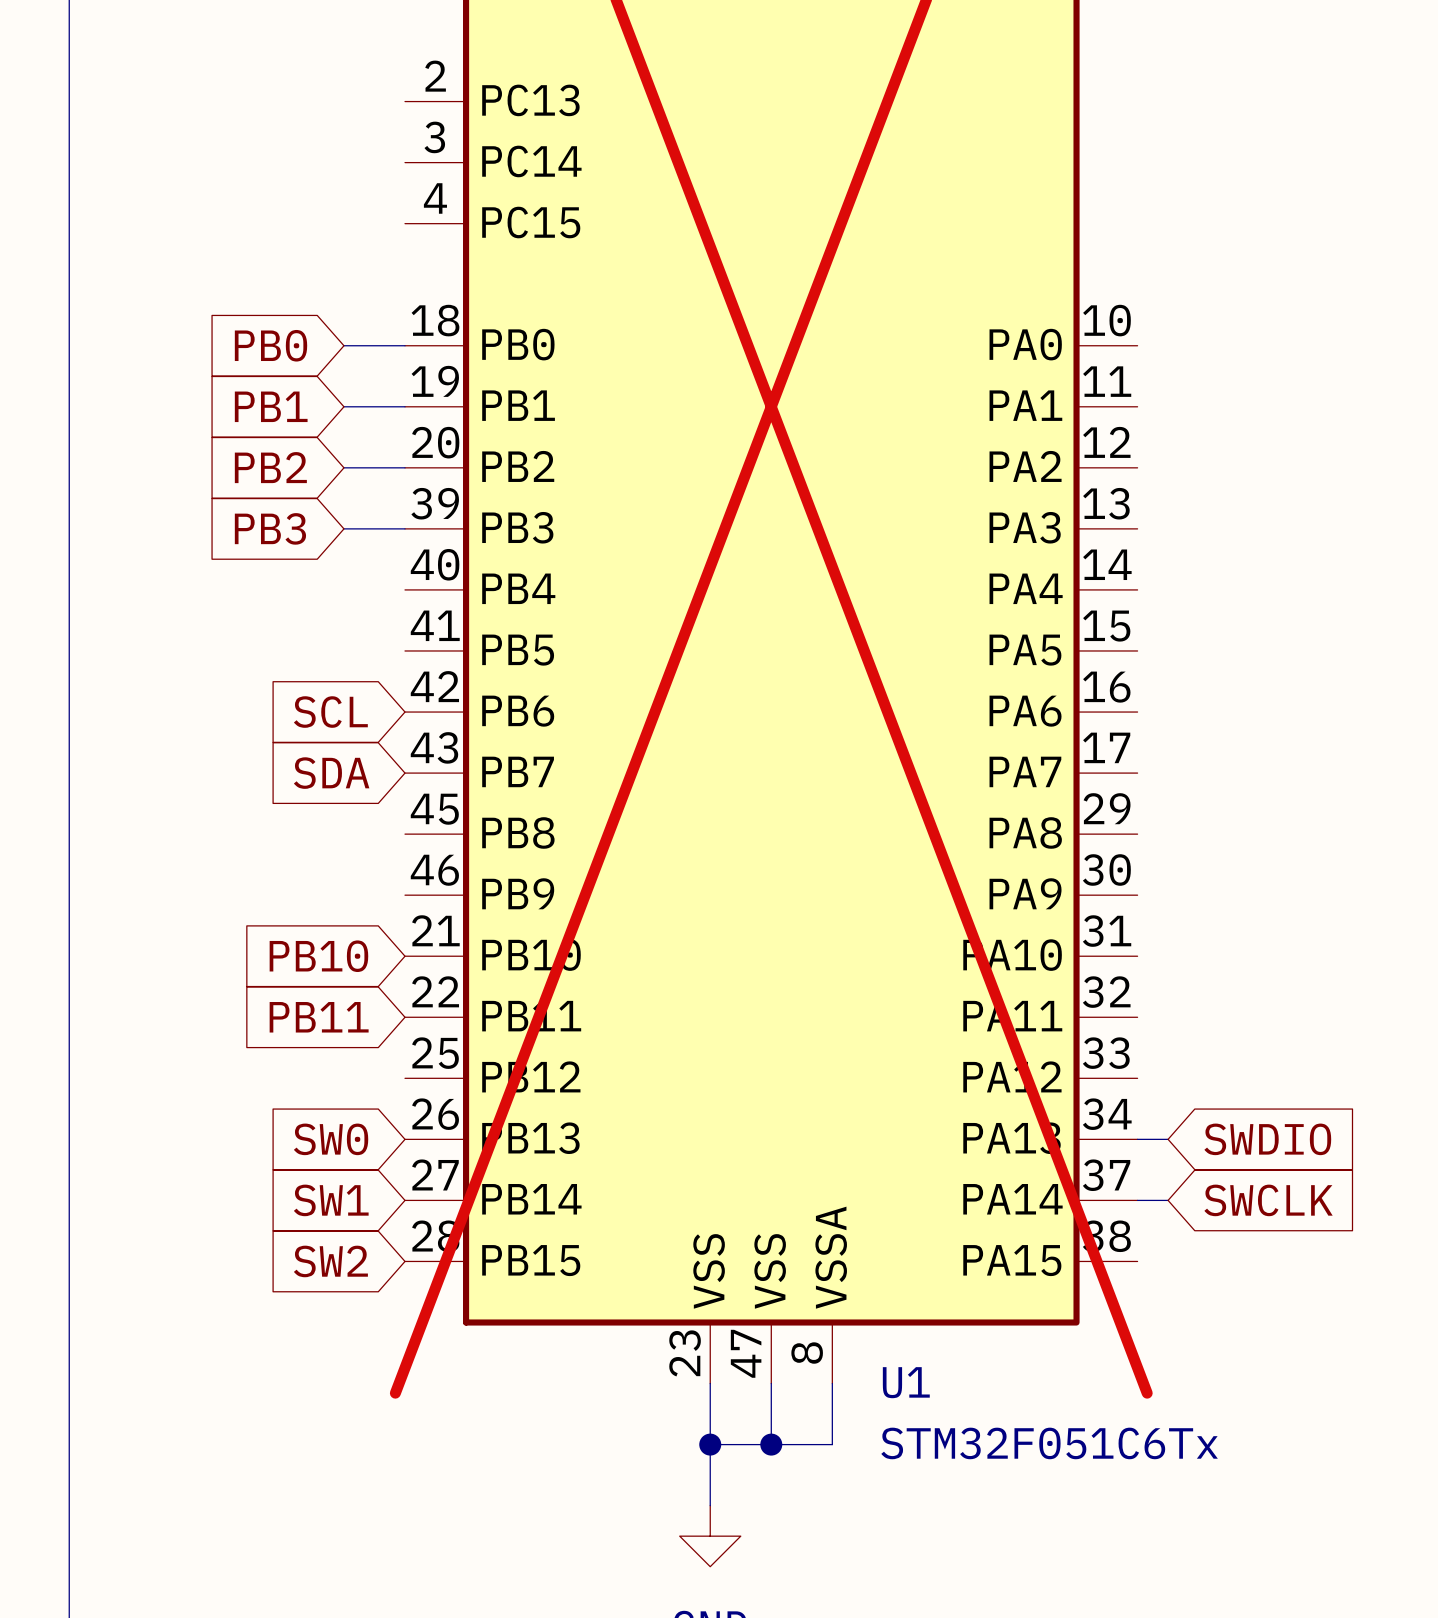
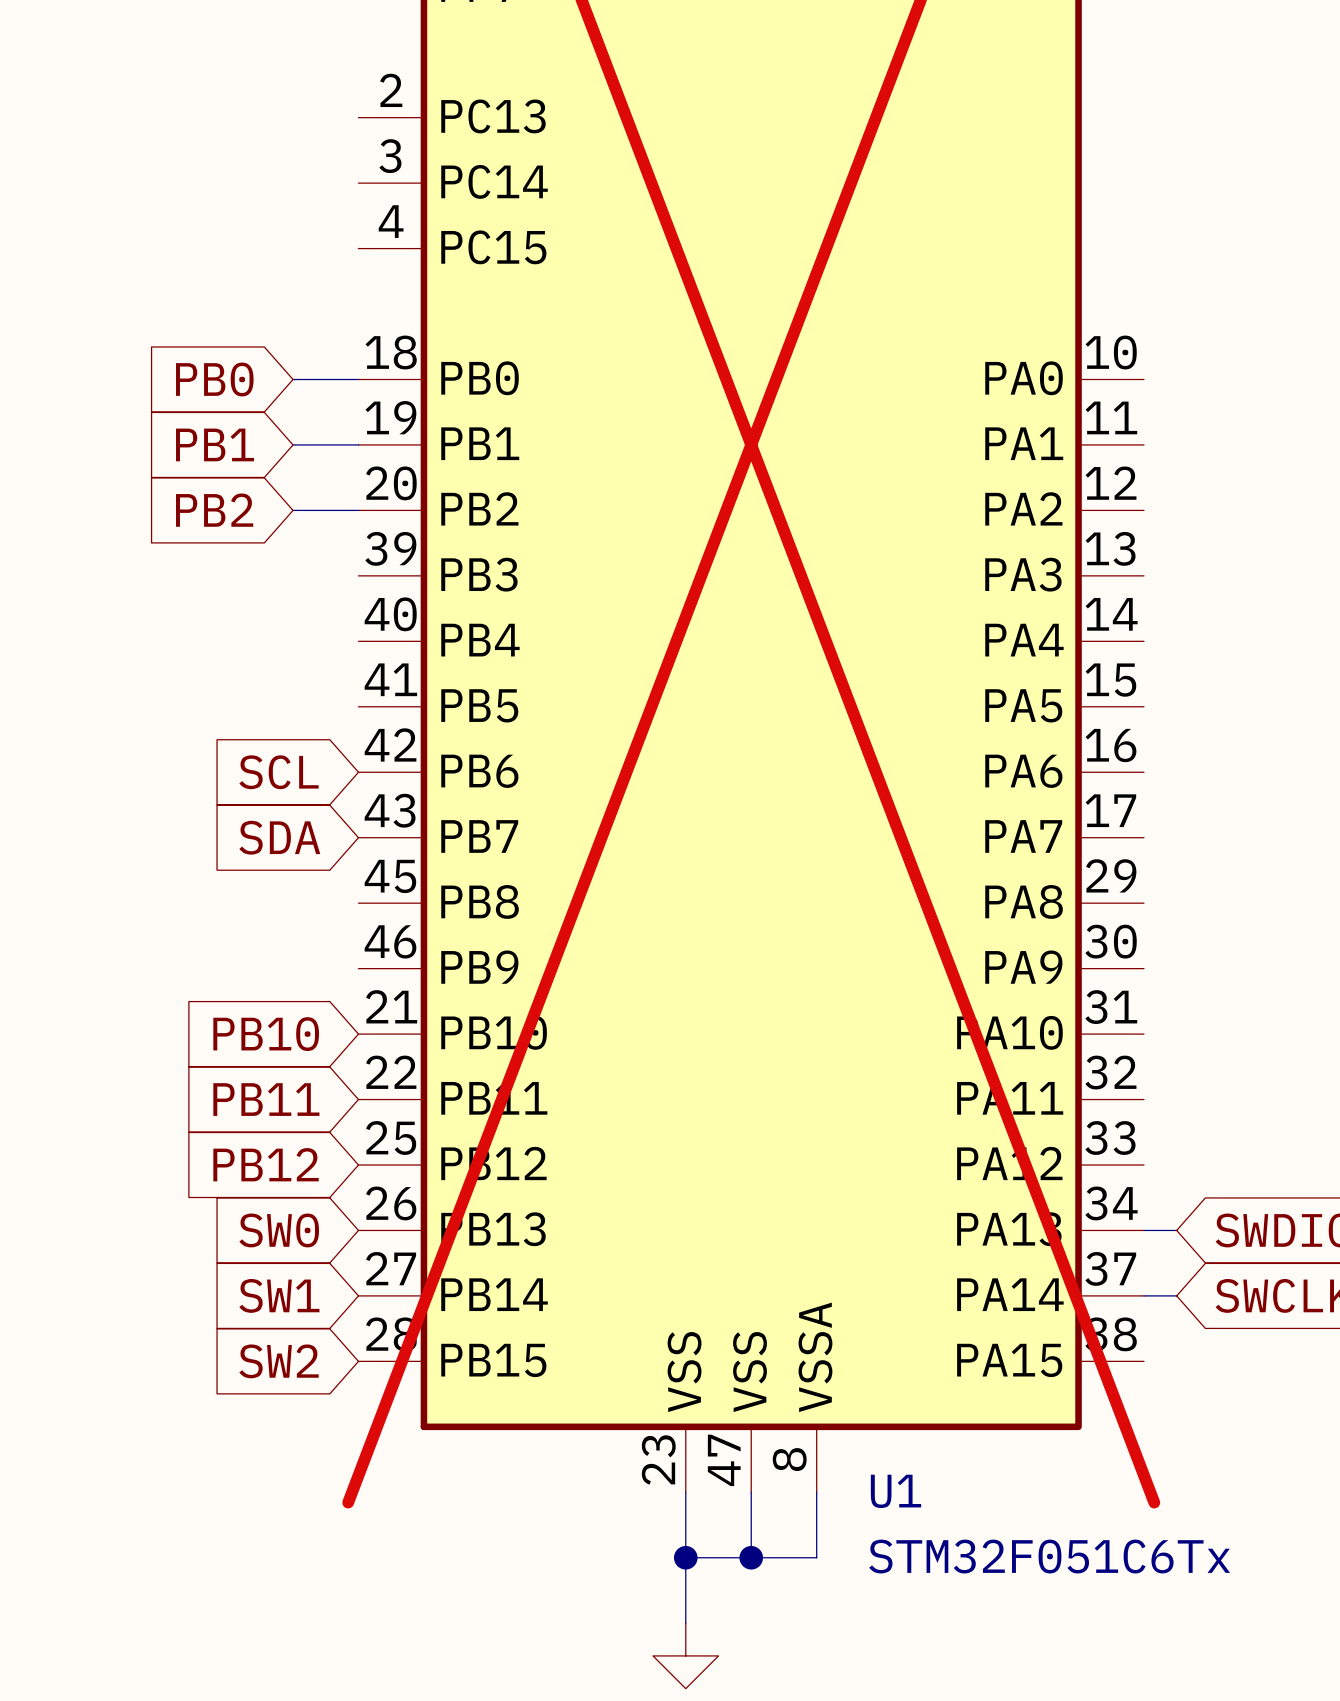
global label: PB3 (270, 528) -> none
wire: (343, 528) (405, 528) -> none
global label: none -> PB12 (266, 1164)

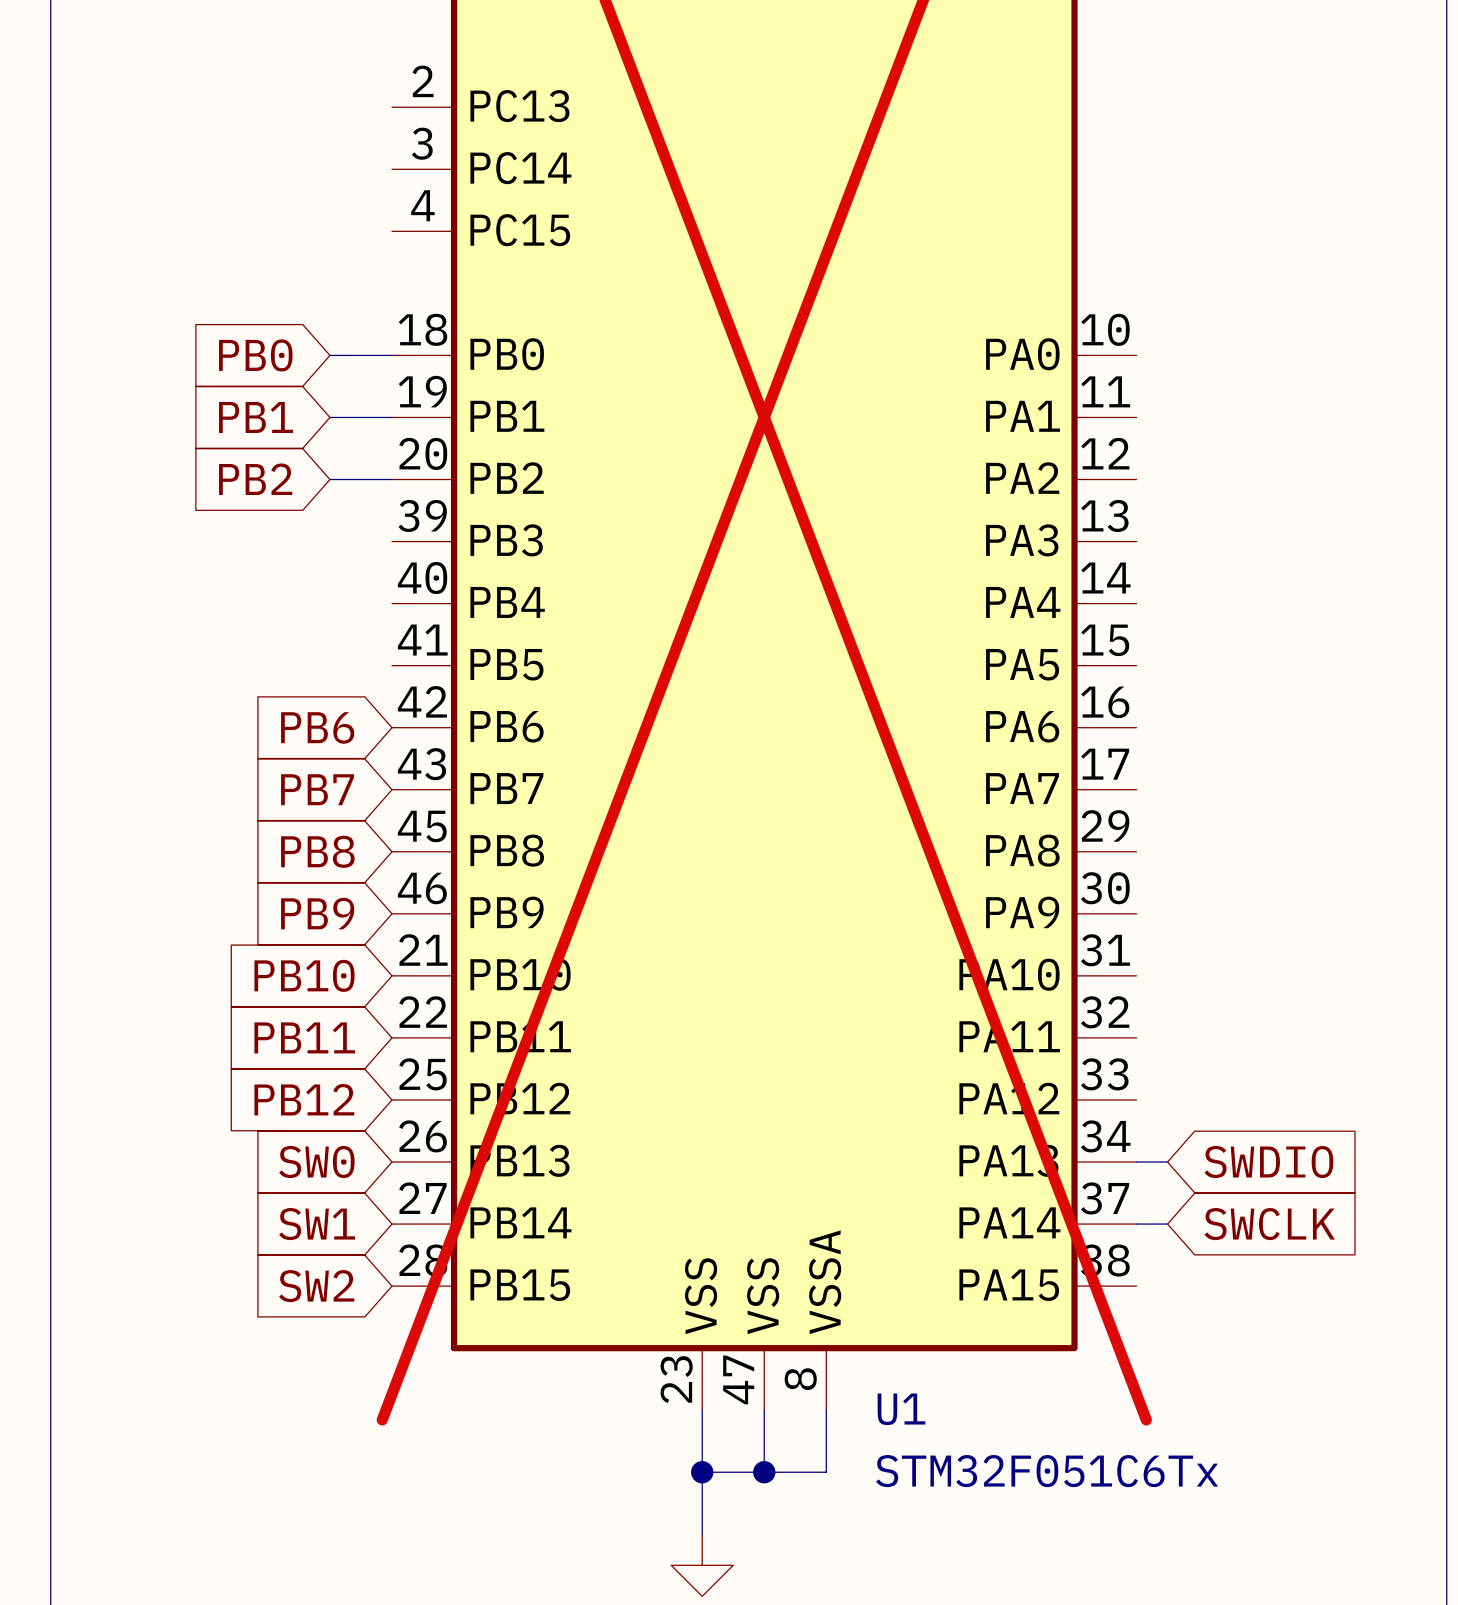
global label: SCL (278, 772) -> PB6 (317, 727)
global label: SDA (279, 837) -> PB7 (317, 789)
global label: none -> PB8 (317, 851)
global label: none -> PB9 (317, 913)

